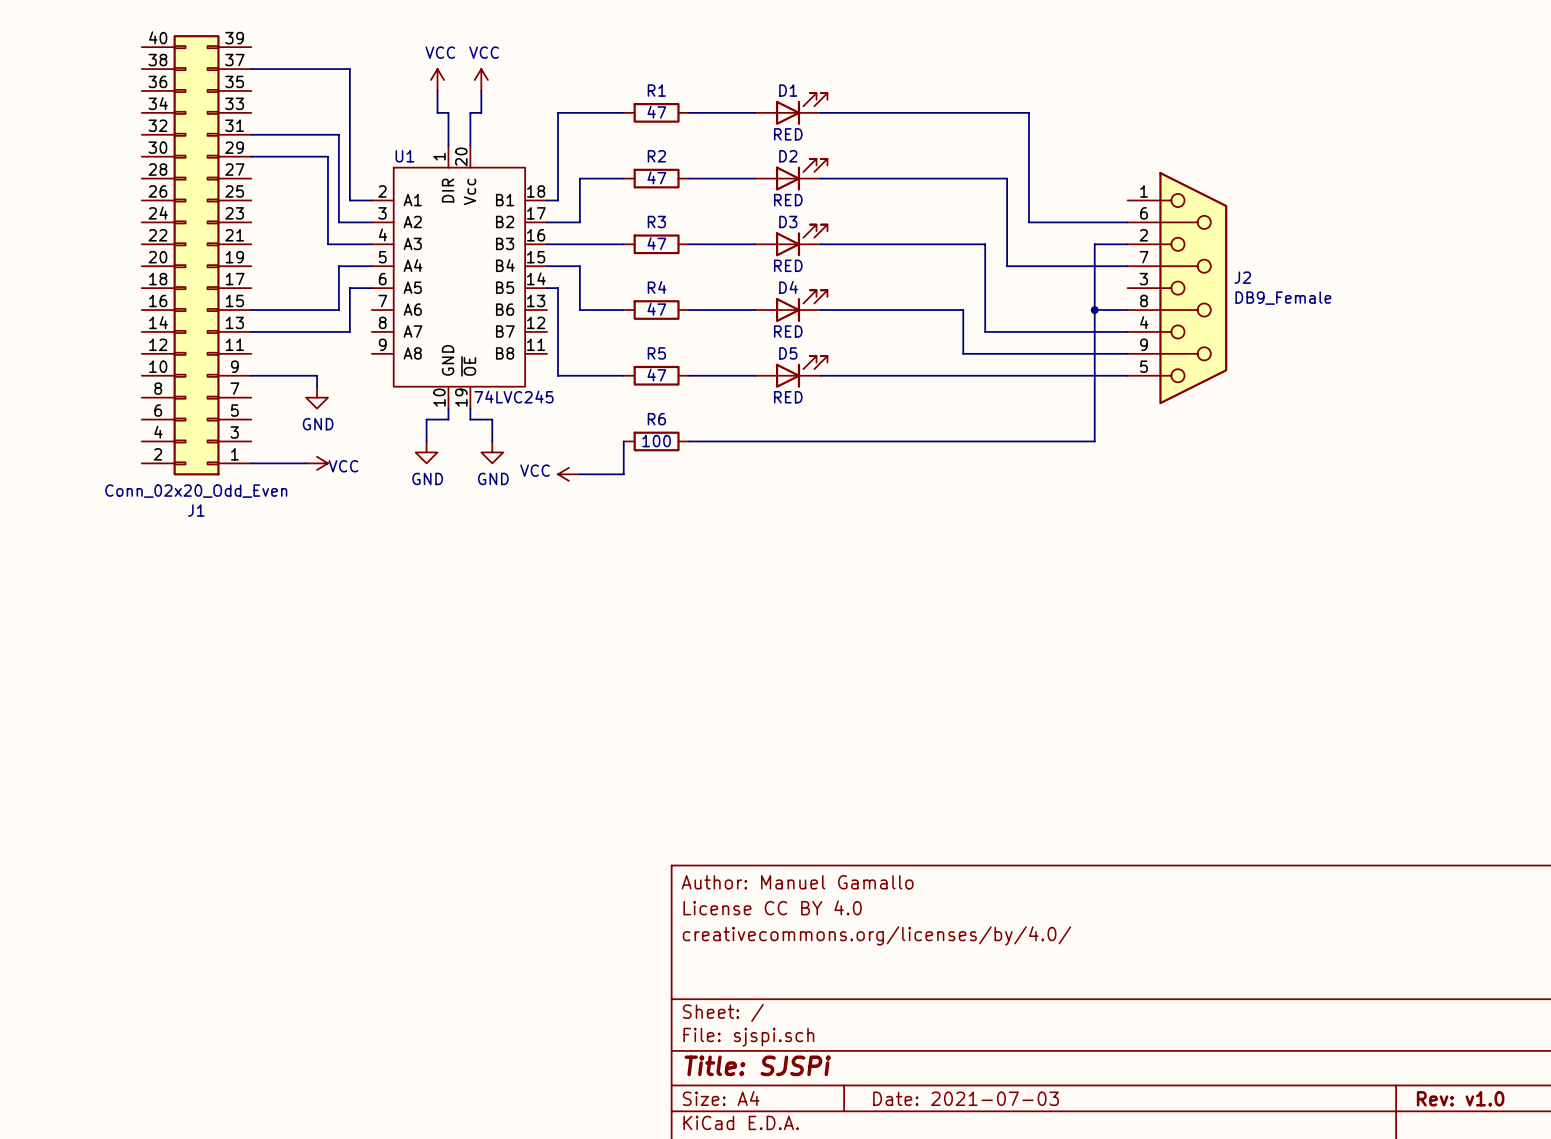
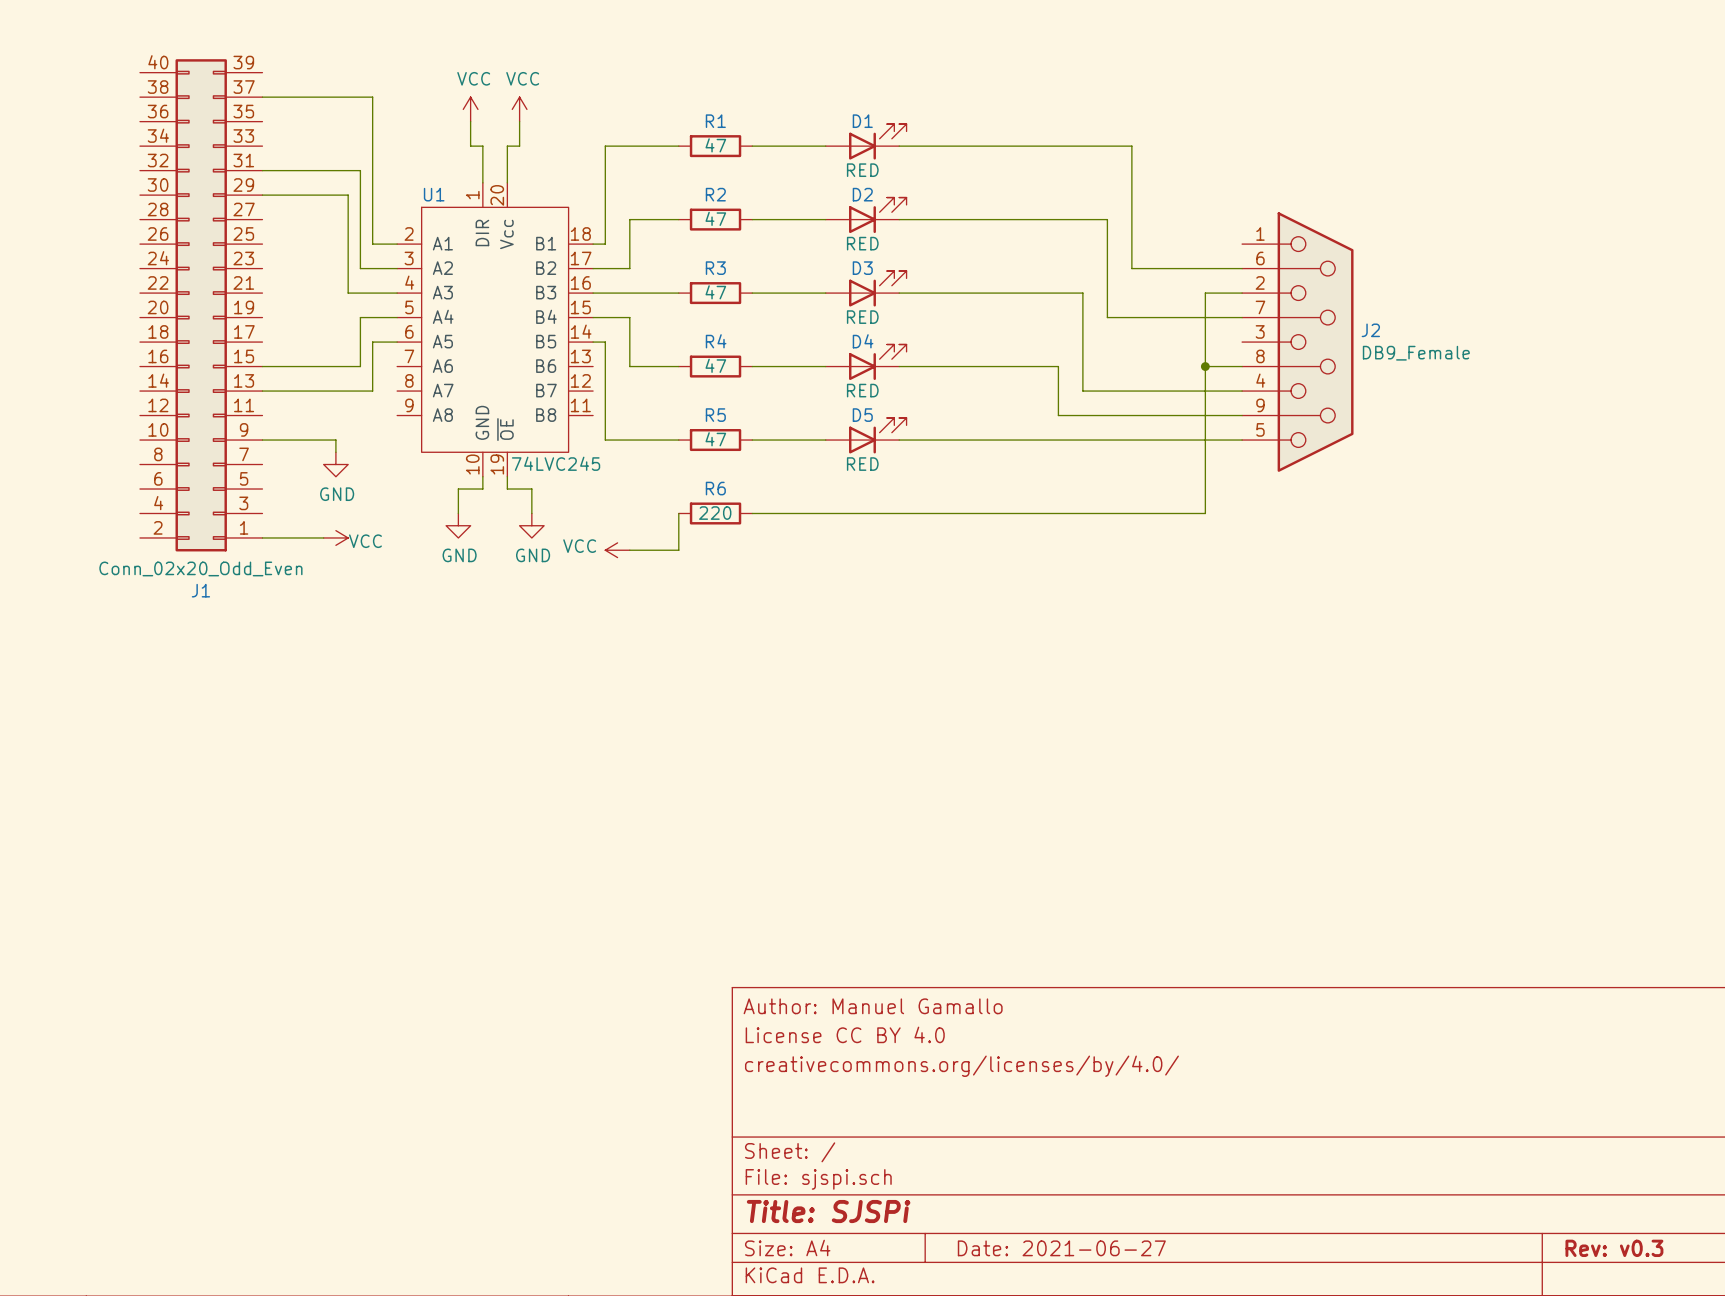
R6 value: 100 (656, 441) -> 220 (715, 513)
title block: Date: 2021-07-03 (966, 1098) -> Date: 2021-06-27 (1061, 1248)
title block: Rev: v1.0 (1460, 1098) -> Rev: v0.3 (1614, 1248)

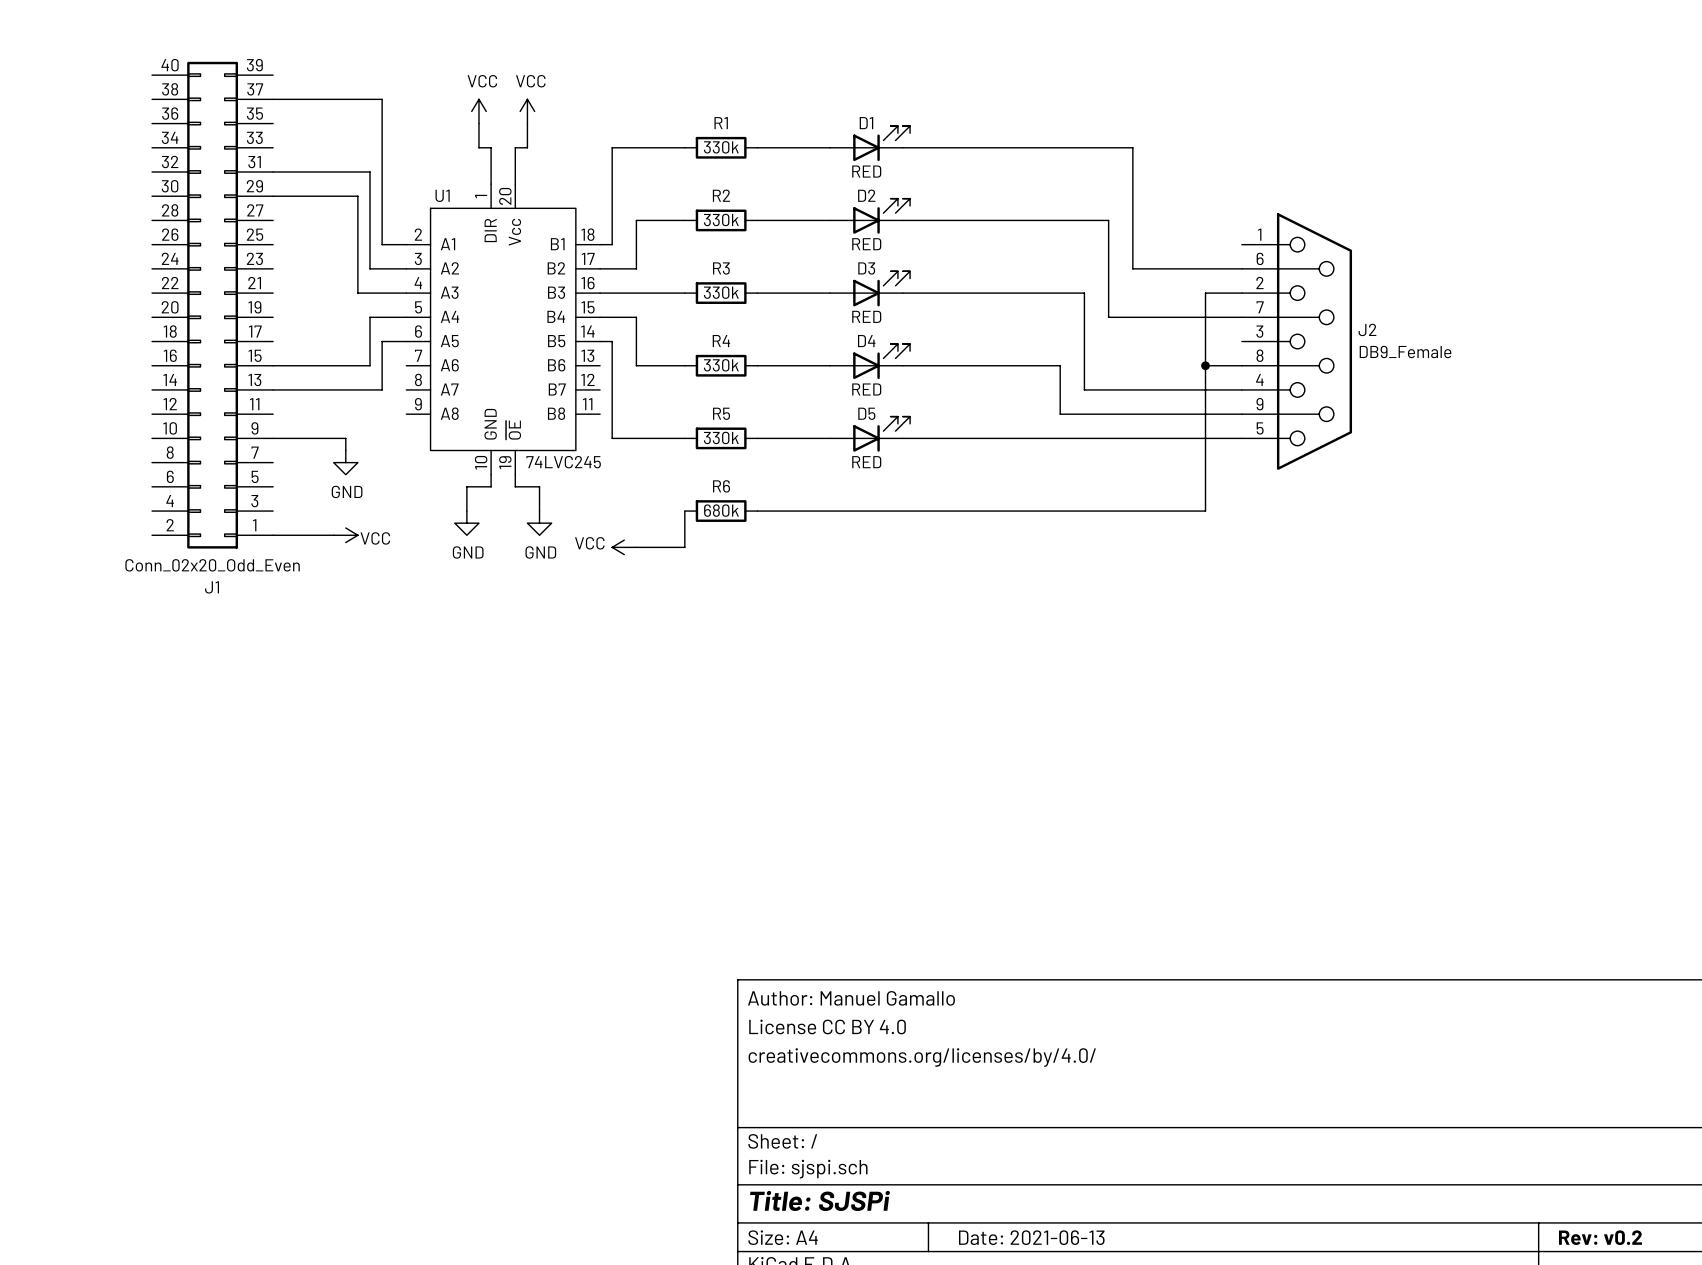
R1 value: 47 (715, 145) -> 330k (721, 147)
R2 value: 47 (715, 218) -> 330k (721, 219)
R3 value: 47 (715, 292) -> 330k (721, 292)
R4 value: 47 (715, 365) -> 330k (721, 365)
R5 value: 47 (715, 439) -> 330k (721, 437)
R6 value: 220 (715, 513) -> 680k (721, 510)
title block: Date: 2021-06-27 (1061, 1248) -> Date: 2021-06-13 (1031, 1237)
title block: Rev: v0.3 (1614, 1248) -> Rev: v0.2 (1600, 1237)

